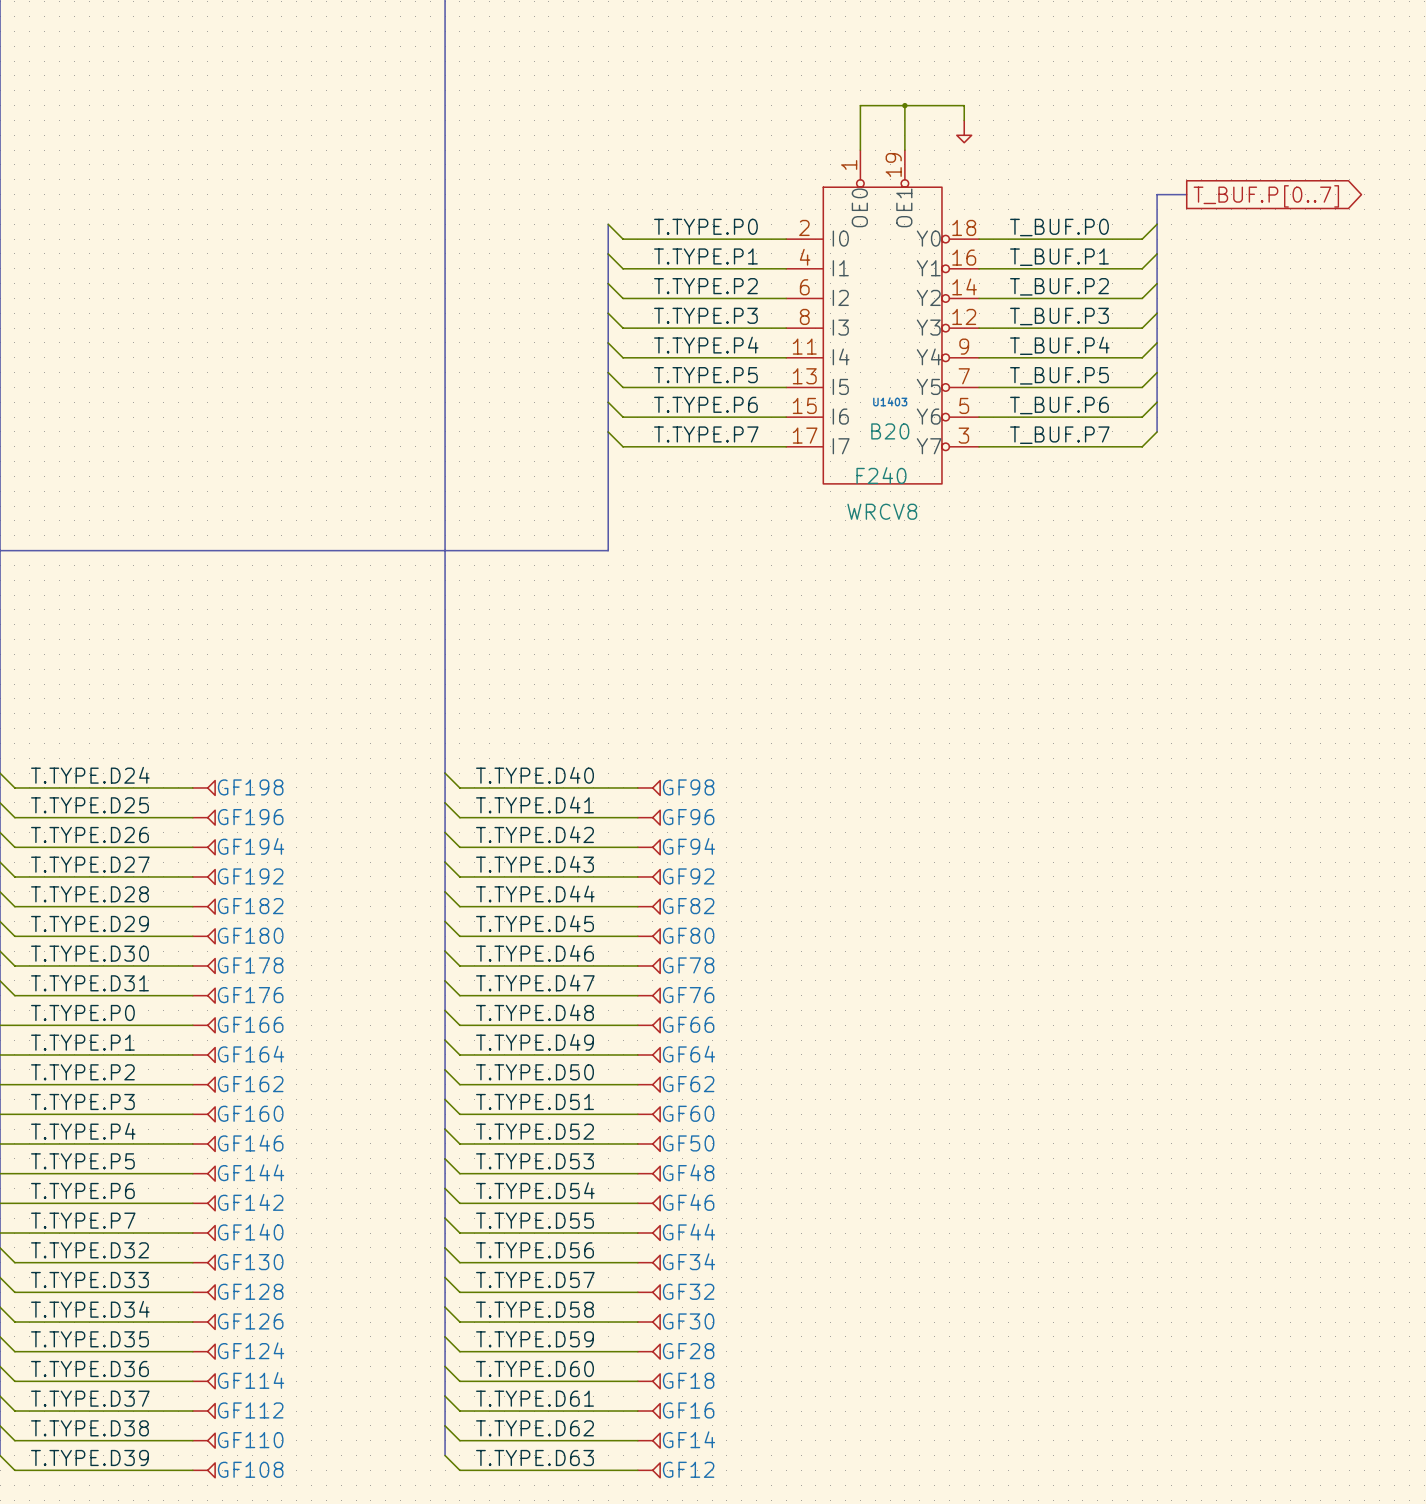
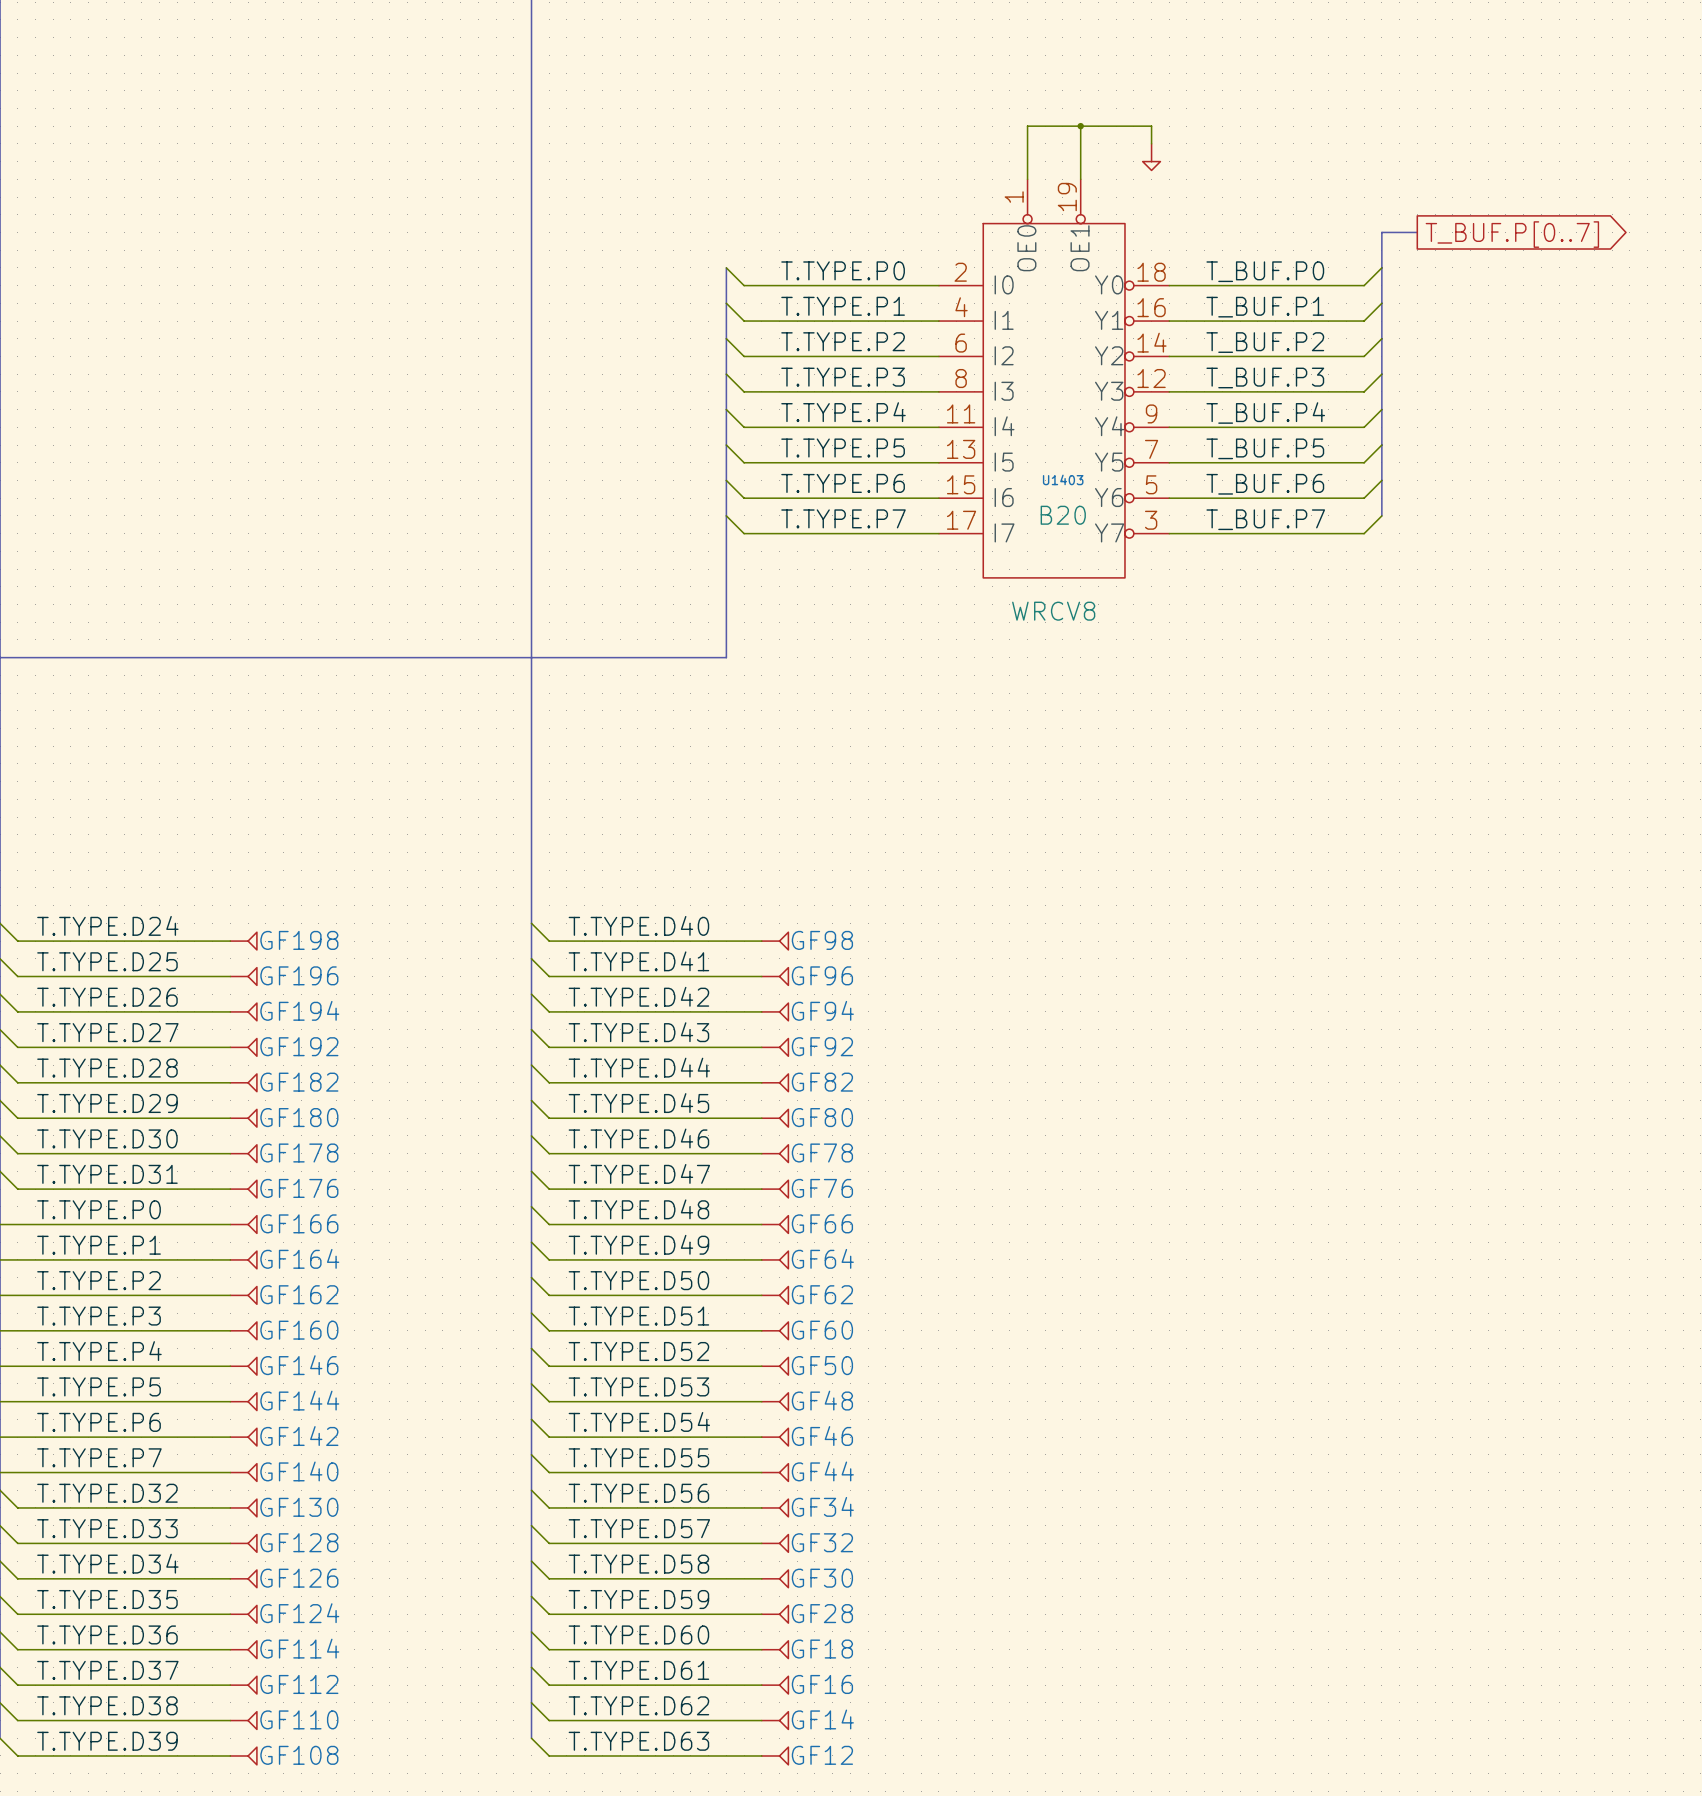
U1403 value: F240 (881, 475) -> none

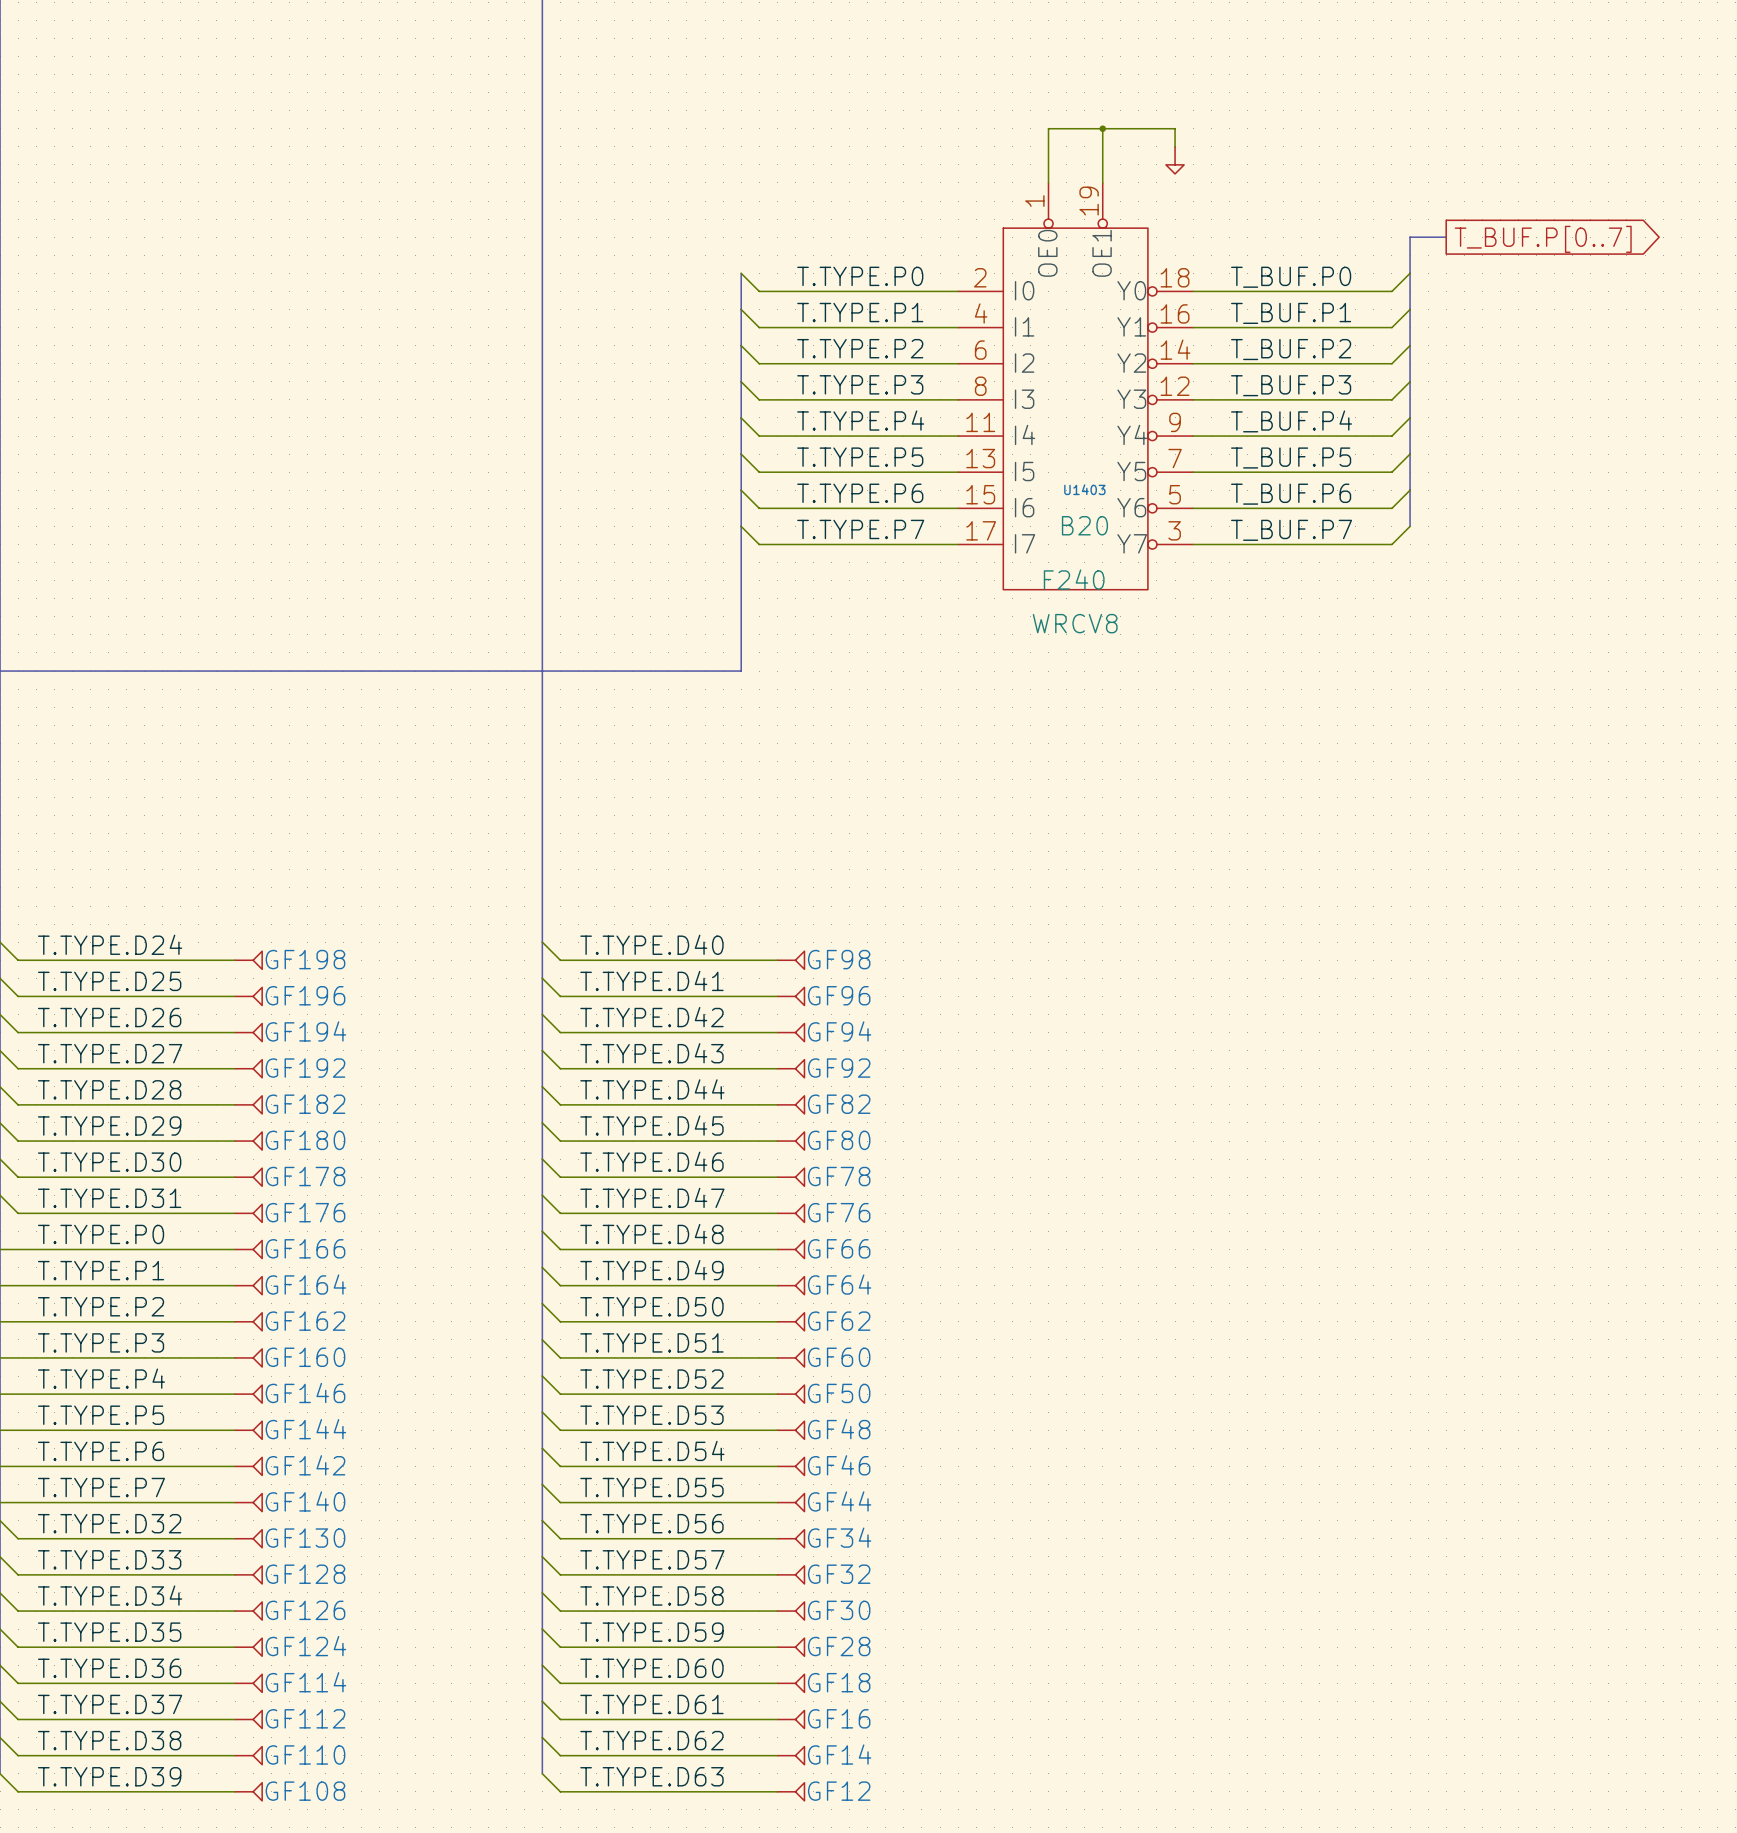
U1403 value: none -> F240 (1074, 579)

